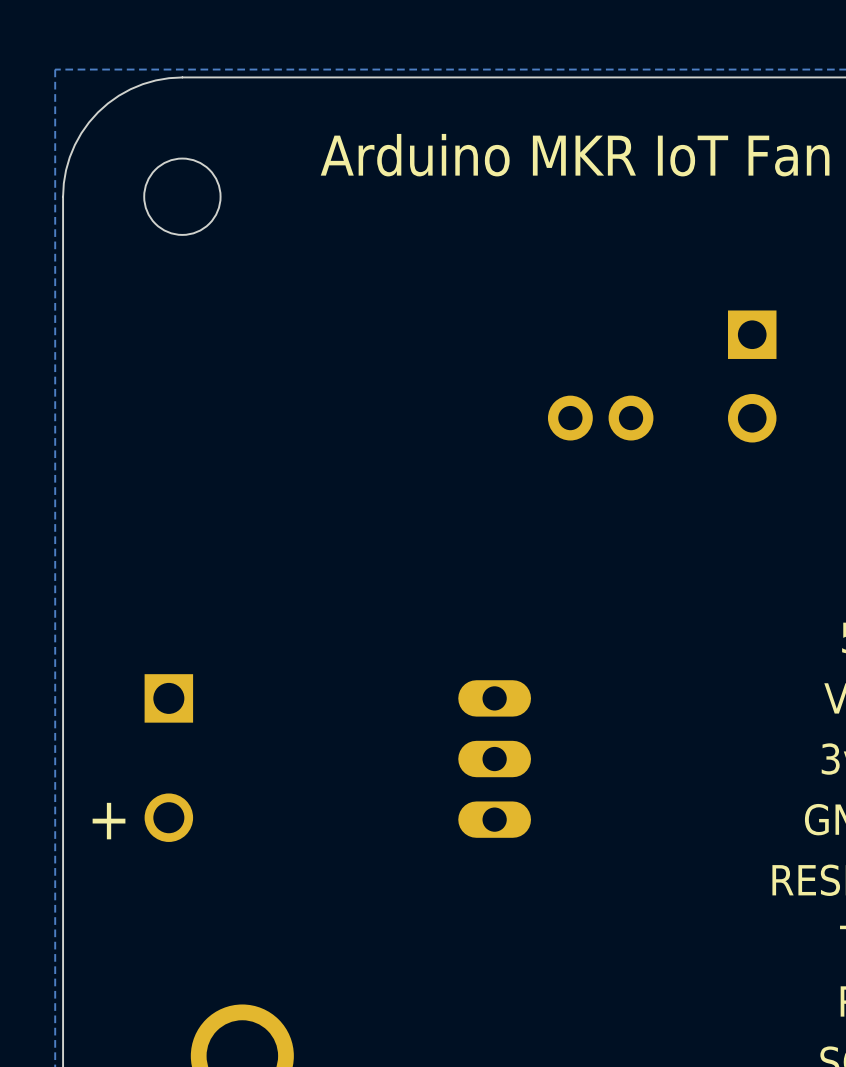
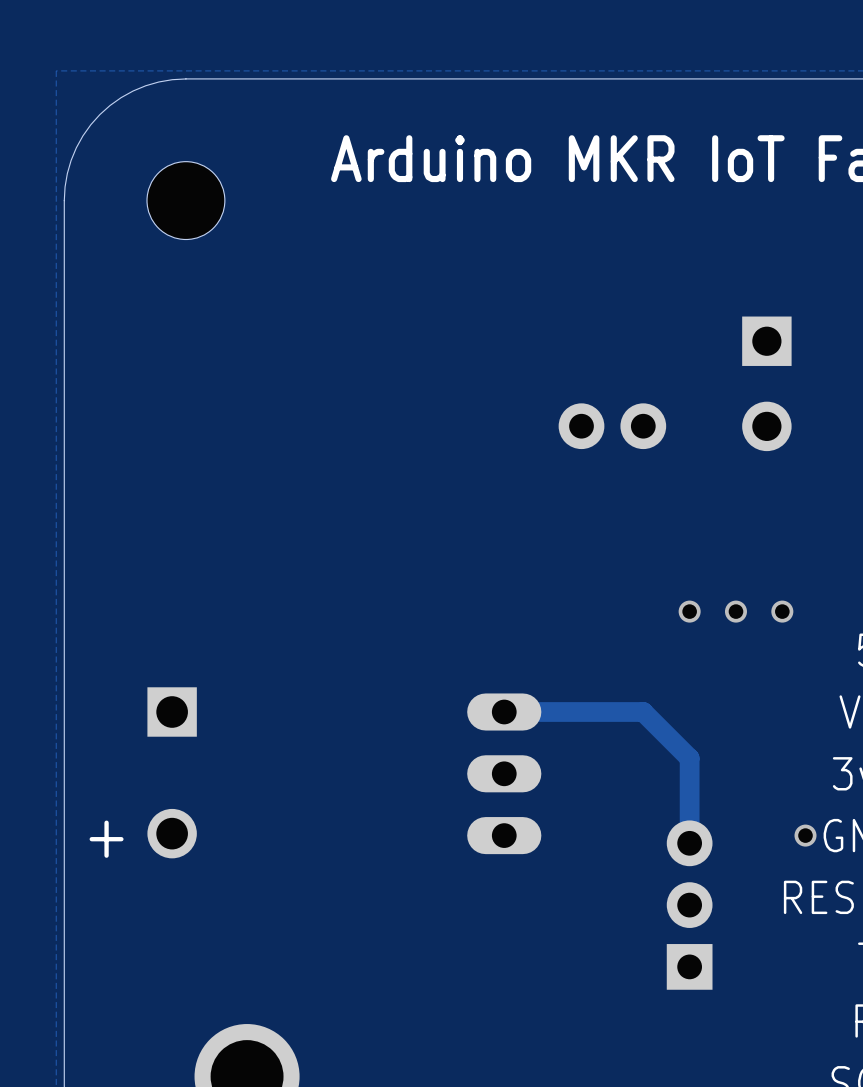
via: none -> (689, 611)
via: none -> (735, 611)
via: none -> (782, 611)
track: none -> (504, 712) (643, 712) (689, 758) (689, 843)
via: none -> (805, 835)
part: none -> (689, 905)

